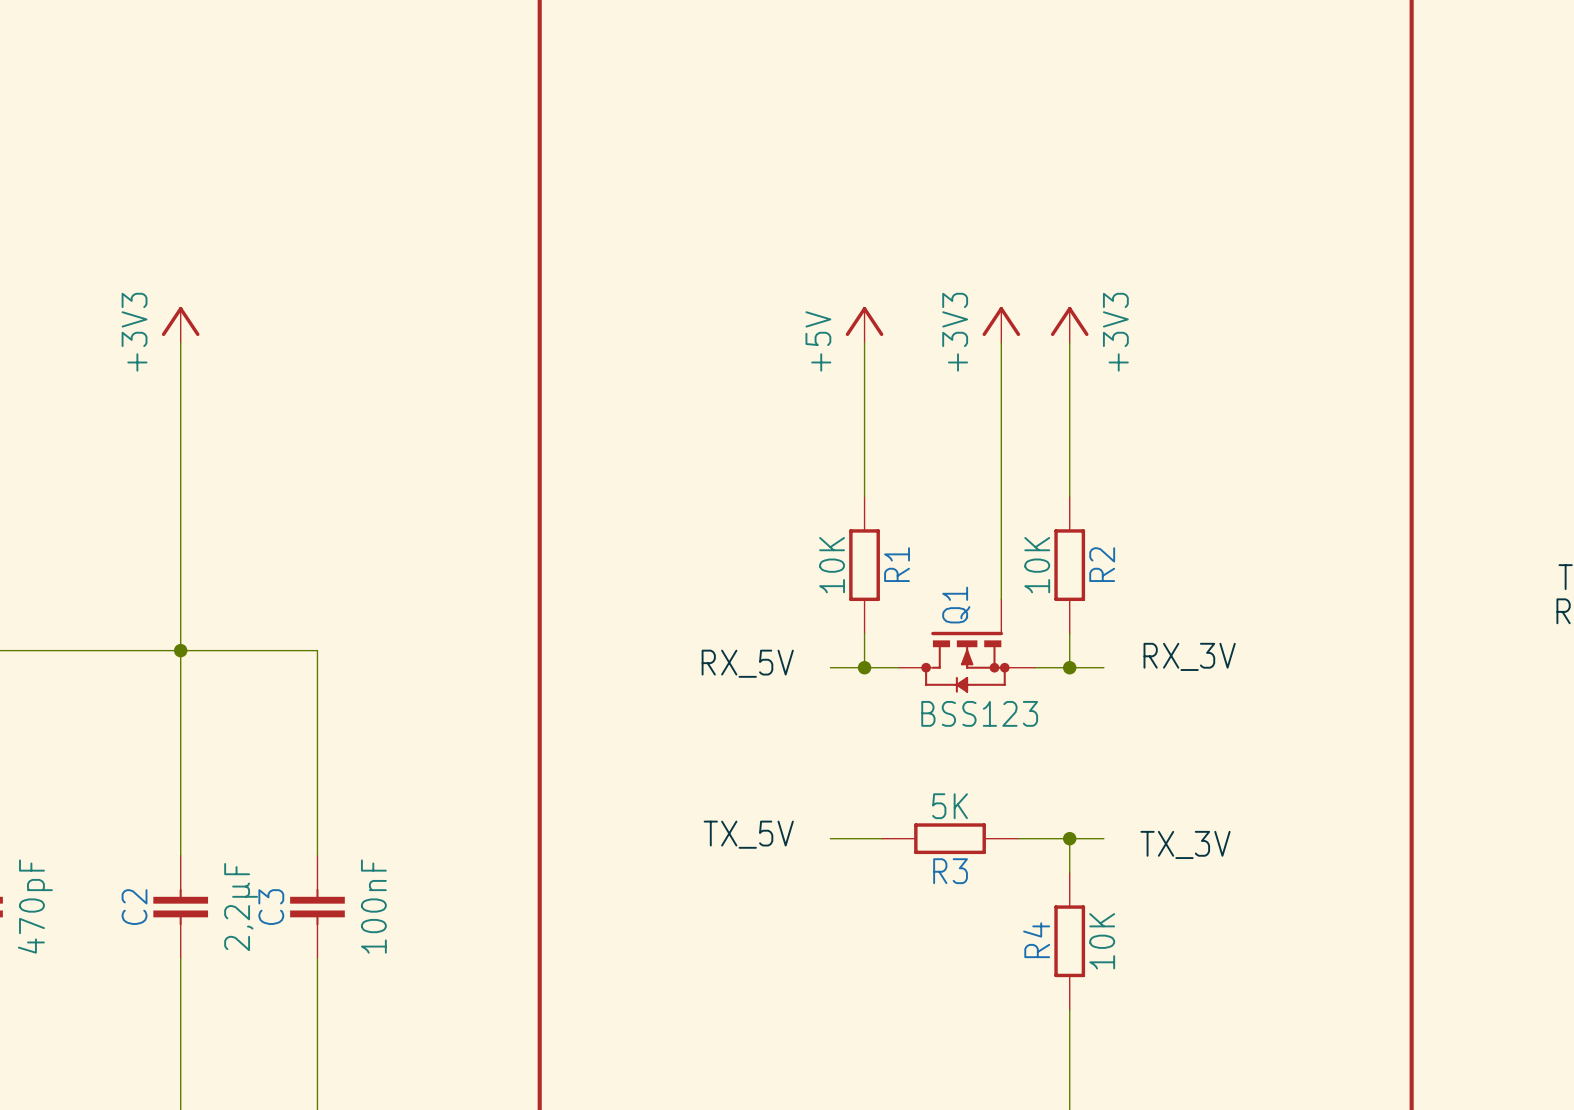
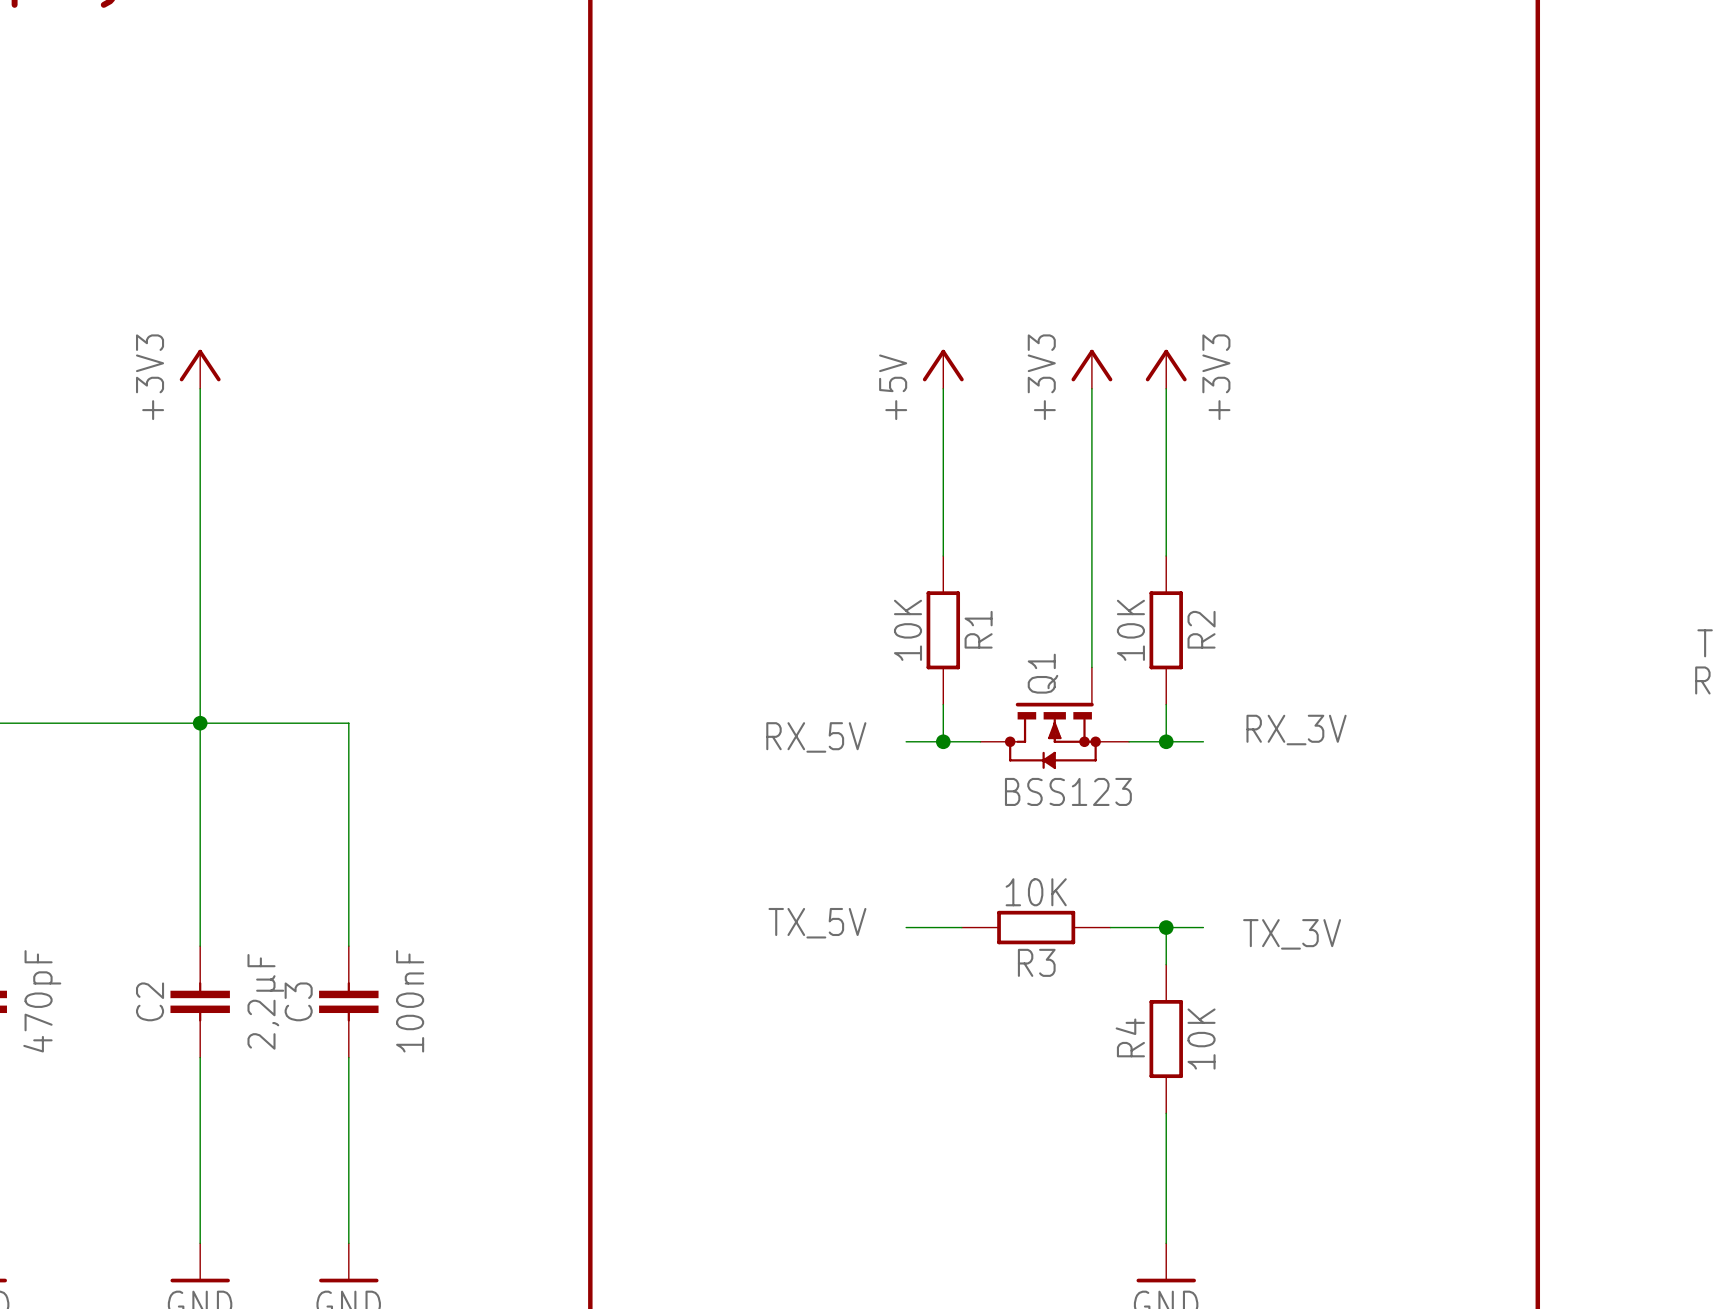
R3 value: 5K (950, 806) -> 10K (1036, 892)

